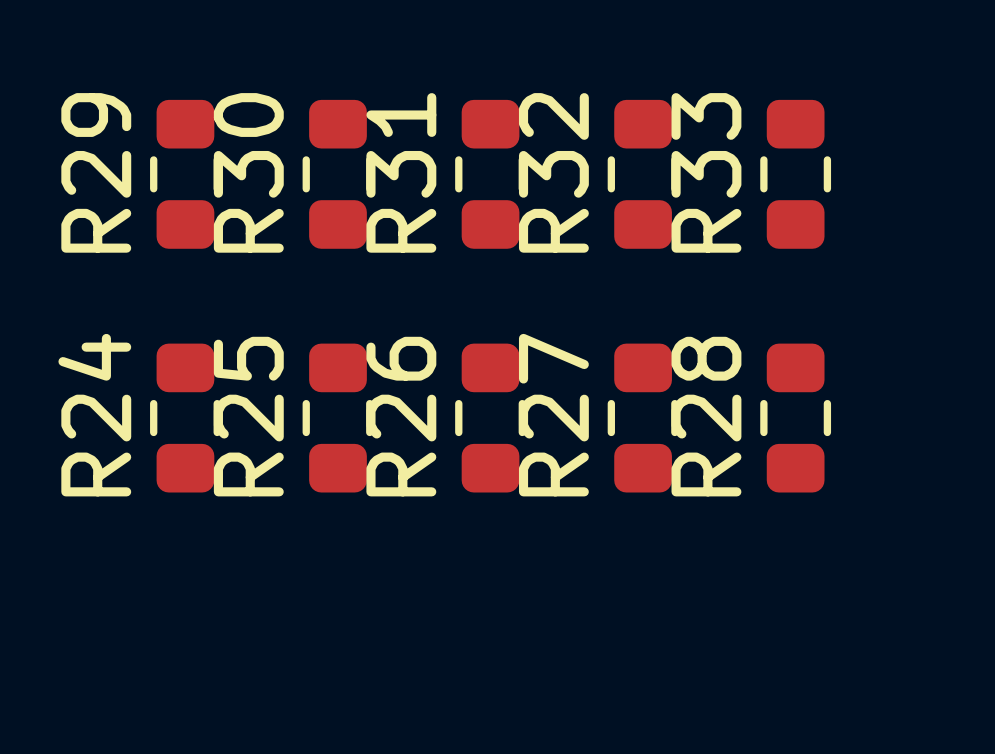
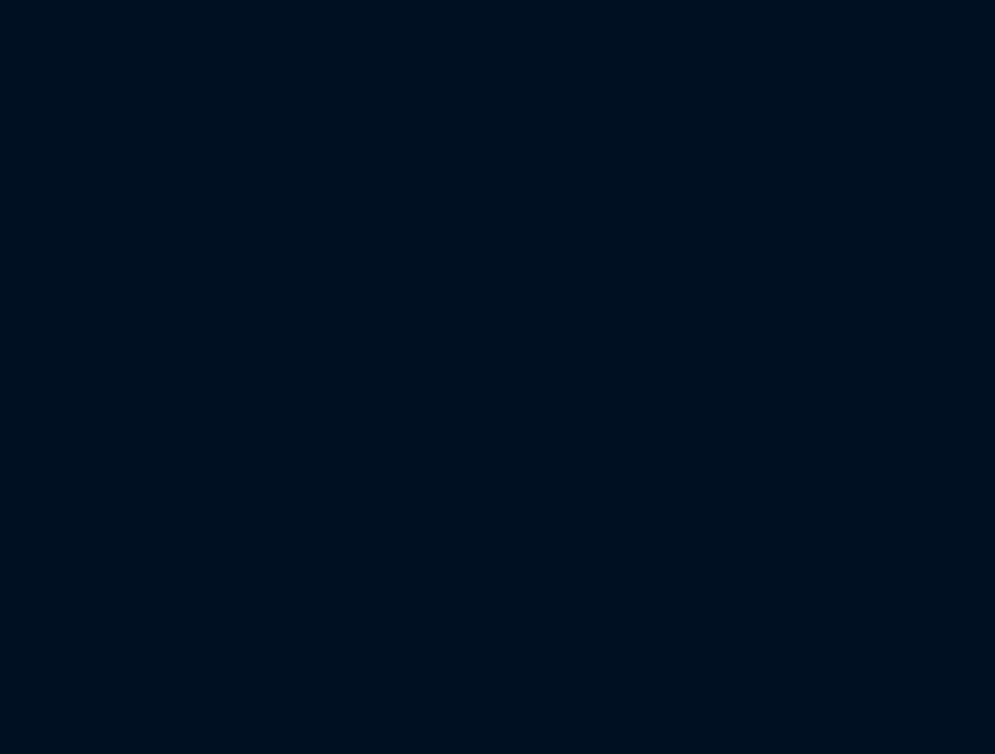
R29: (185, 174) -> none
R30: (338, 174) -> none
R31: (490, 174) -> none
R32: (643, 174) -> none
R33: (795, 174) -> none
R24: (185, 418) -> none
R25: (338, 418) -> none
R26: (490, 418) -> none
R27: (643, 418) -> none
R28: (795, 418) -> none

